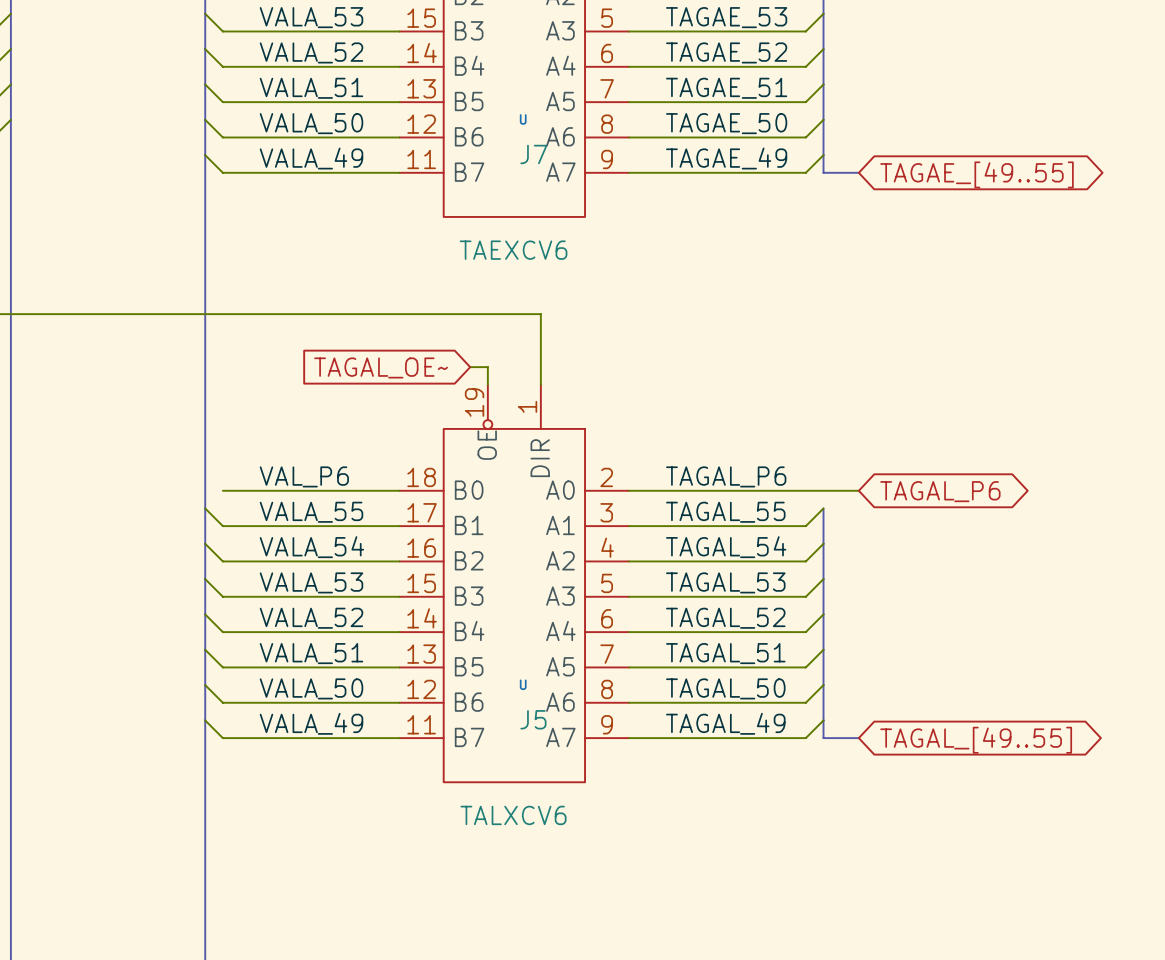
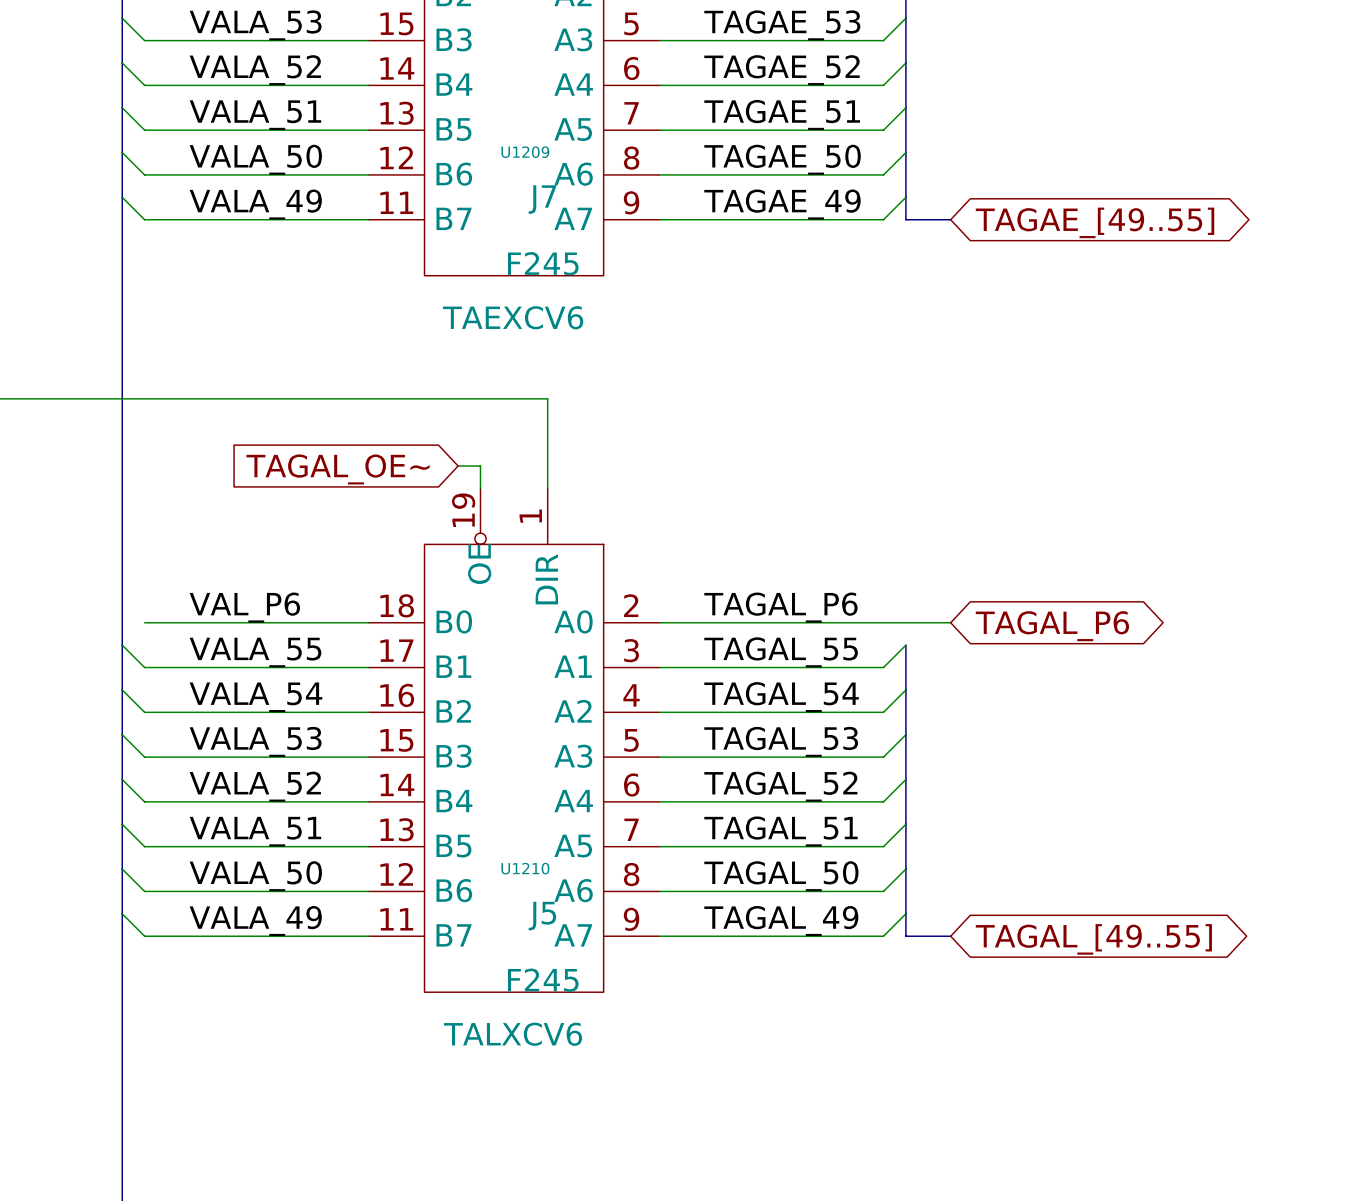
U name: U (523, 119) -> U1209 (525, 152)
U value: none -> F245 (543, 263)
U name: U (523, 684) -> U1210 (525, 868)
U value: none -> F245 (543, 980)

